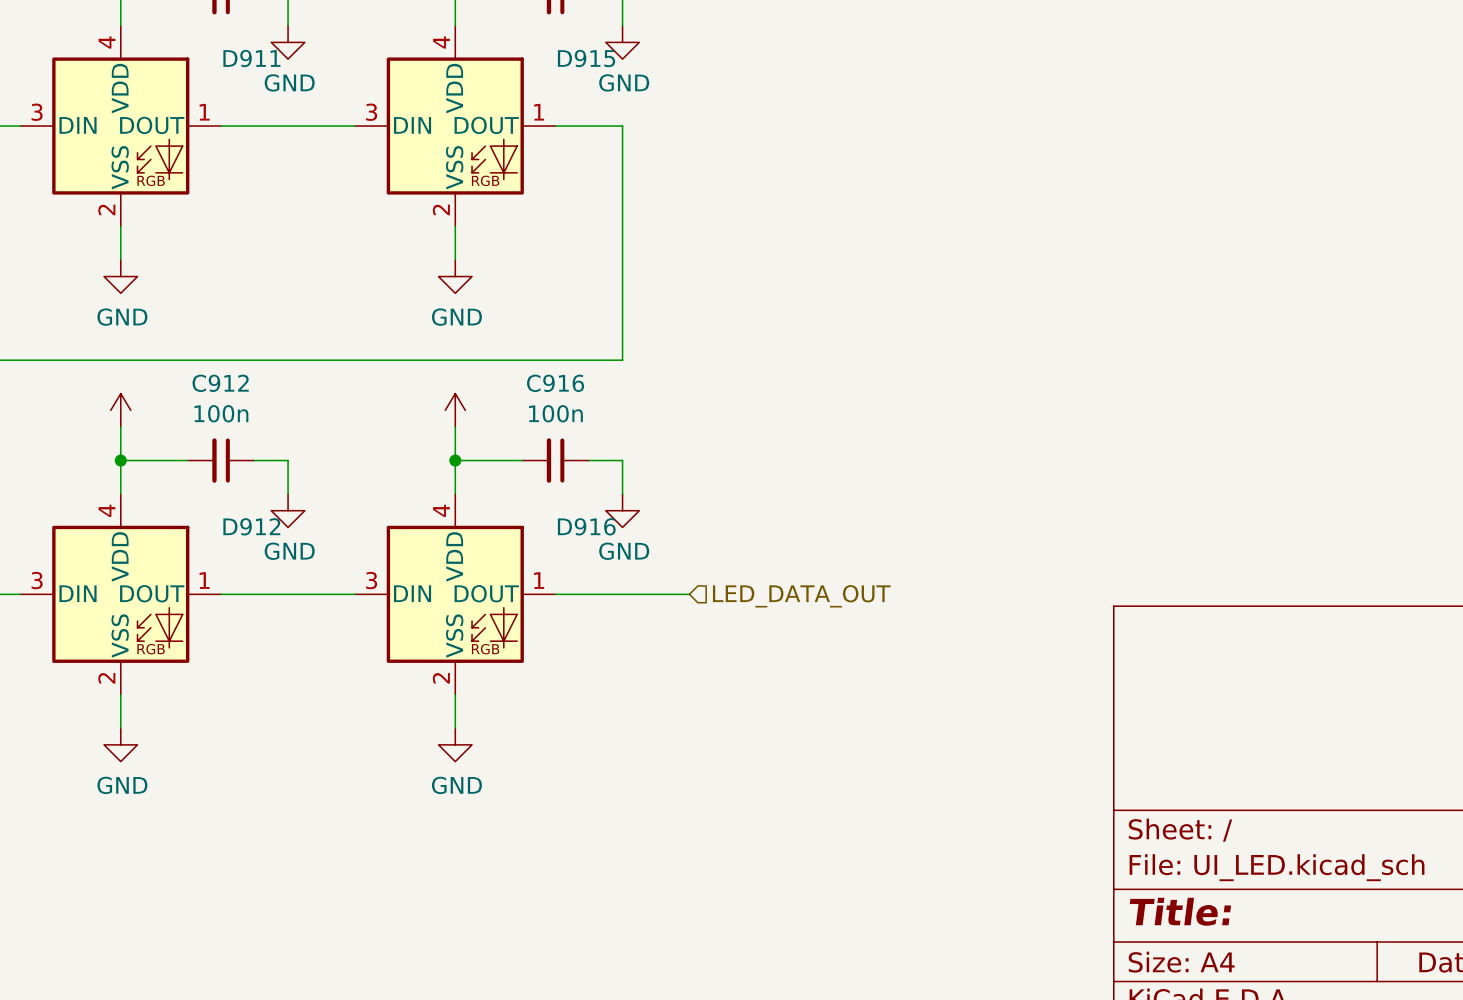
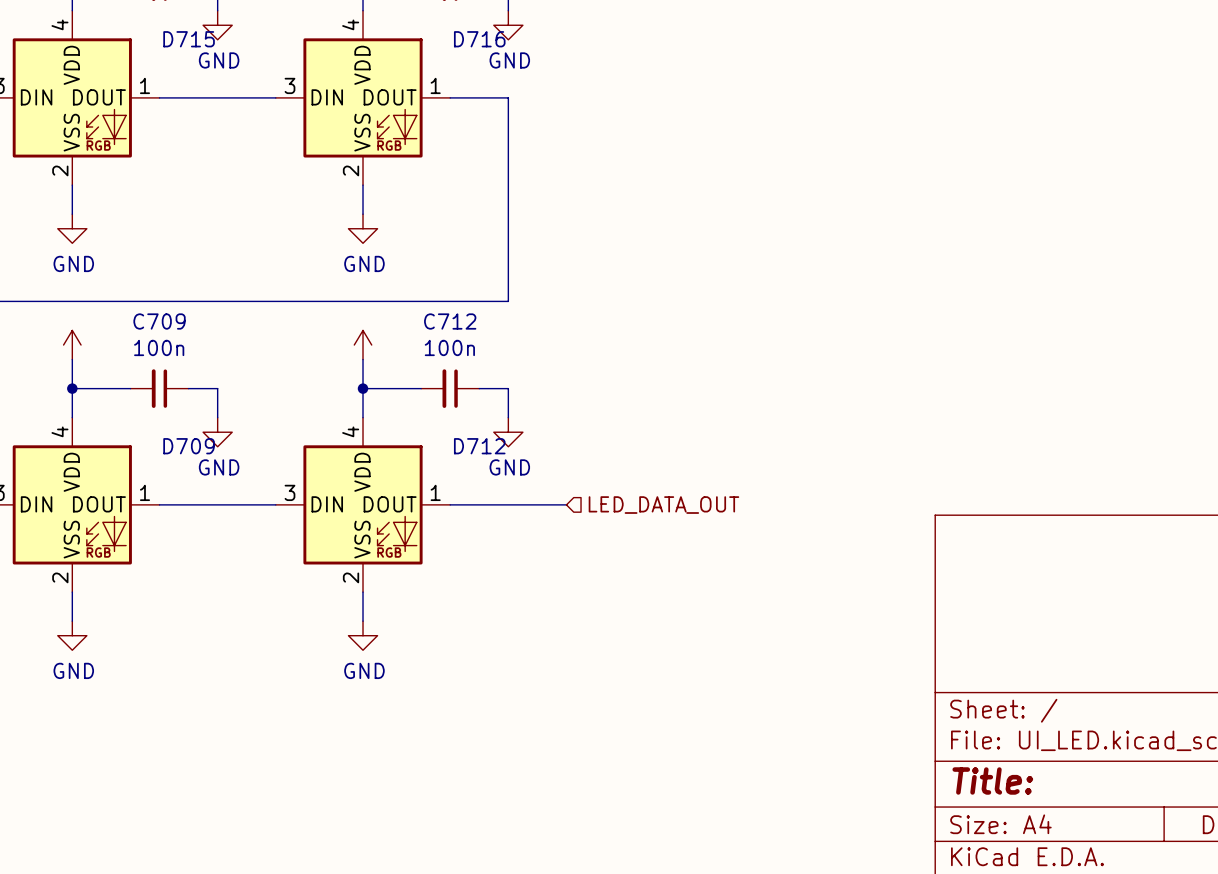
D911 name: D911 (251, 58) -> D715 (189, 39)
D915 name: D915 (586, 58) -> D716 (479, 39)
C912 name: C912 (220, 383) -> C709 (159, 321)
C916 name: C916 (555, 383) -> C712 (450, 321)
D912 name: D912 (251, 526) -> D709 (189, 446)
D916 name: D916 (586, 526) -> D712 (479, 446)

